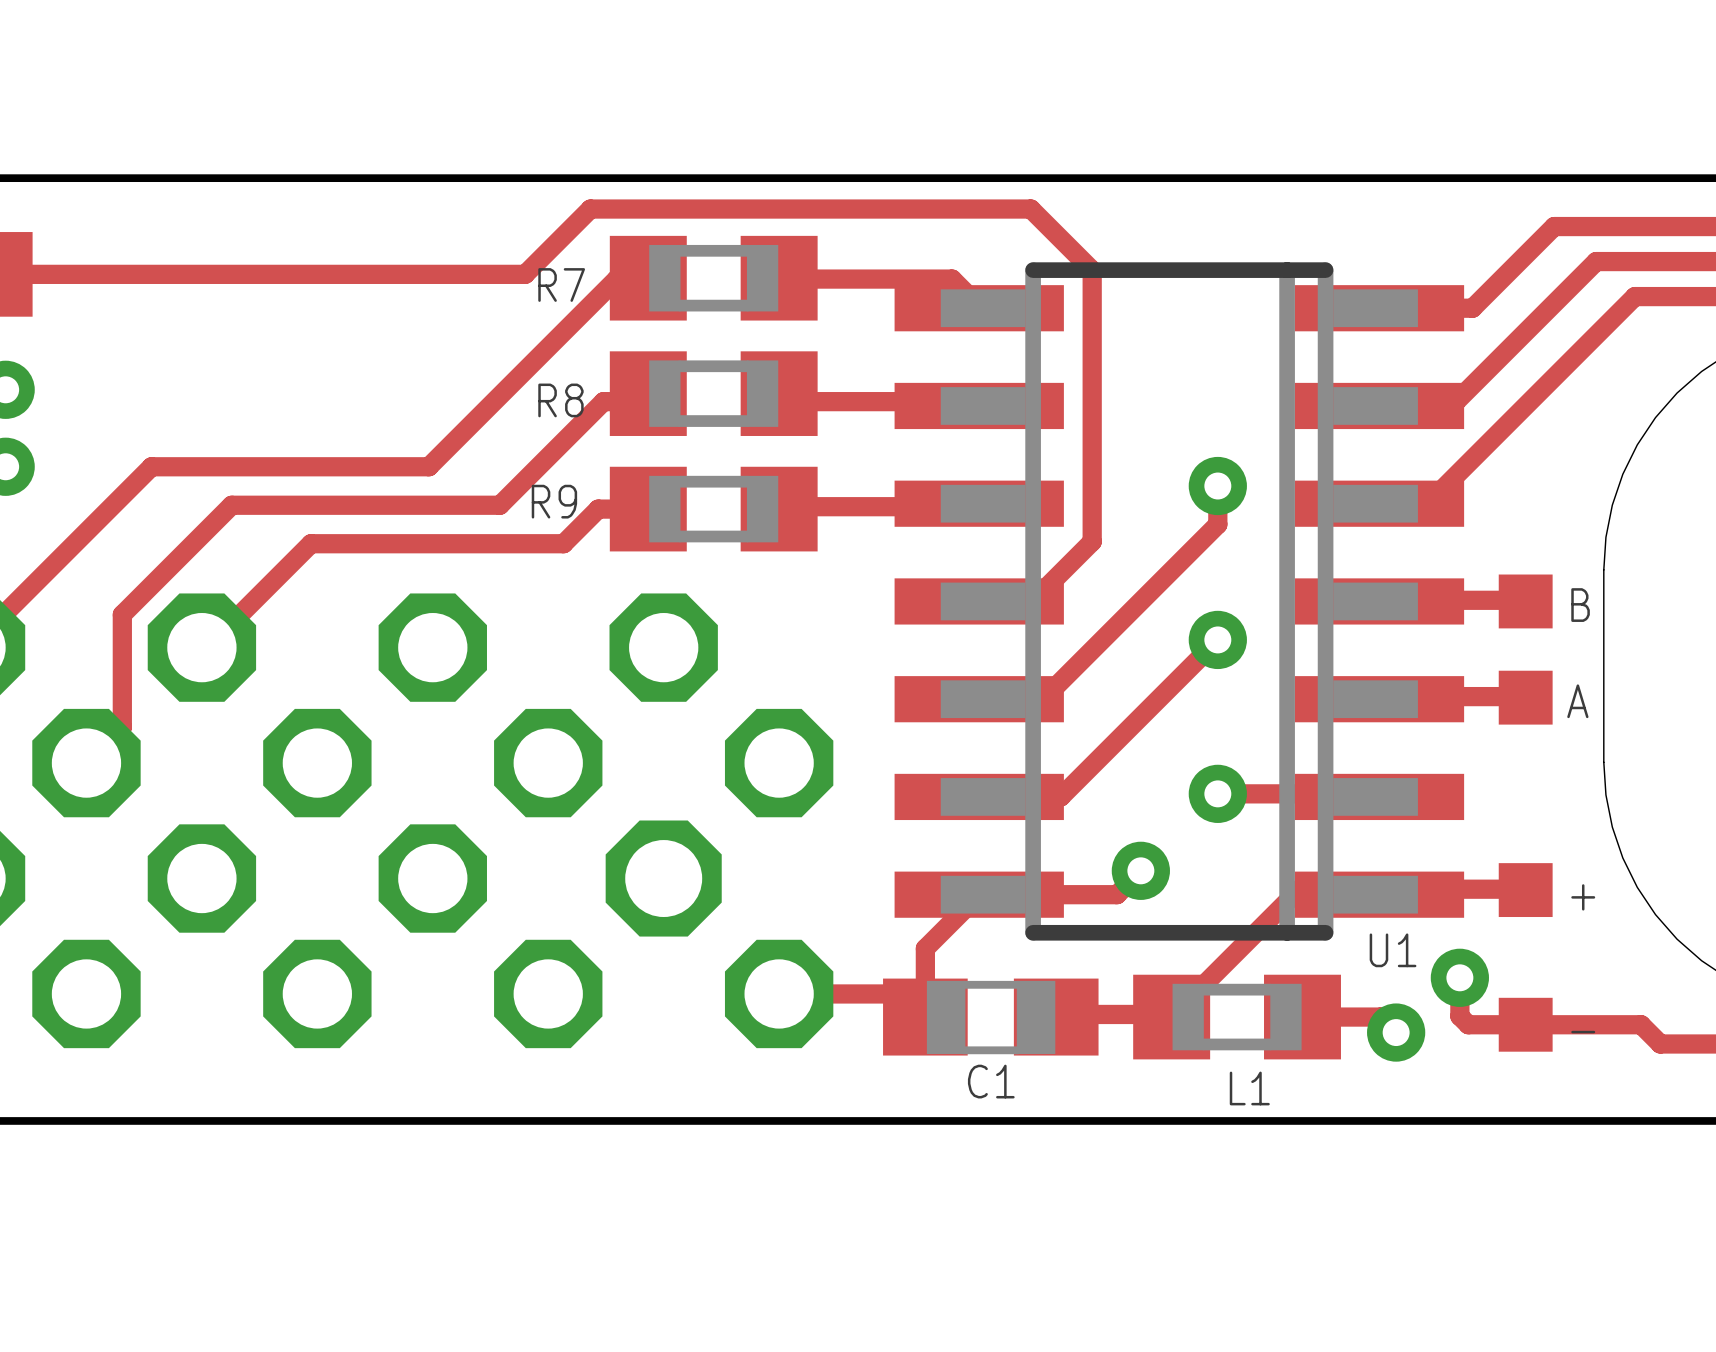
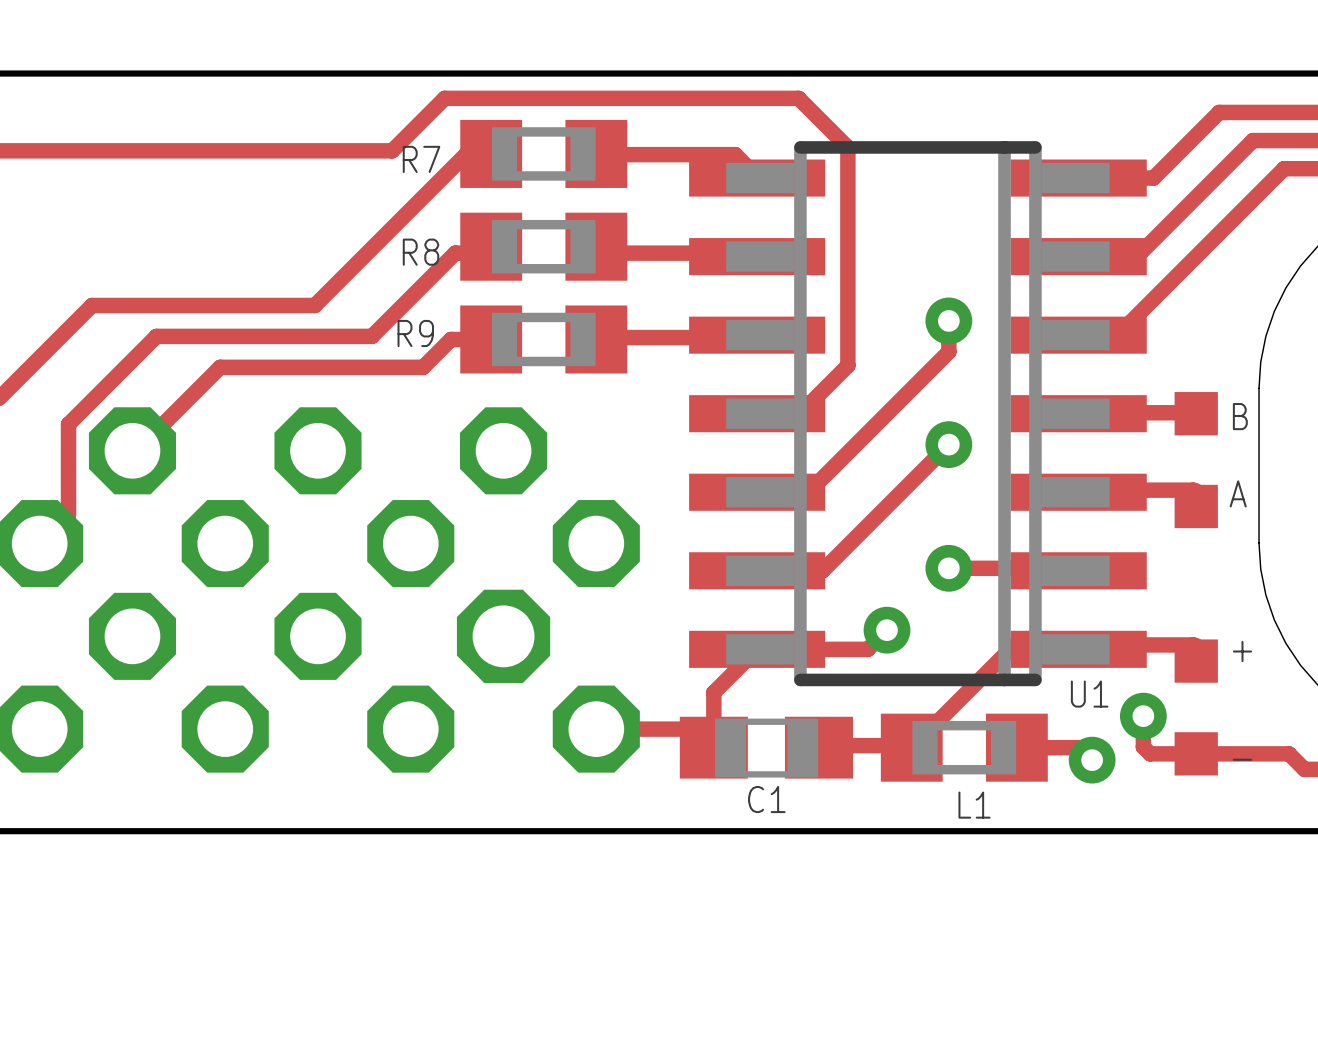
part position: (1525, 697) -> (1196, 506)
part position: (1525, 890) -> (1196, 661)

